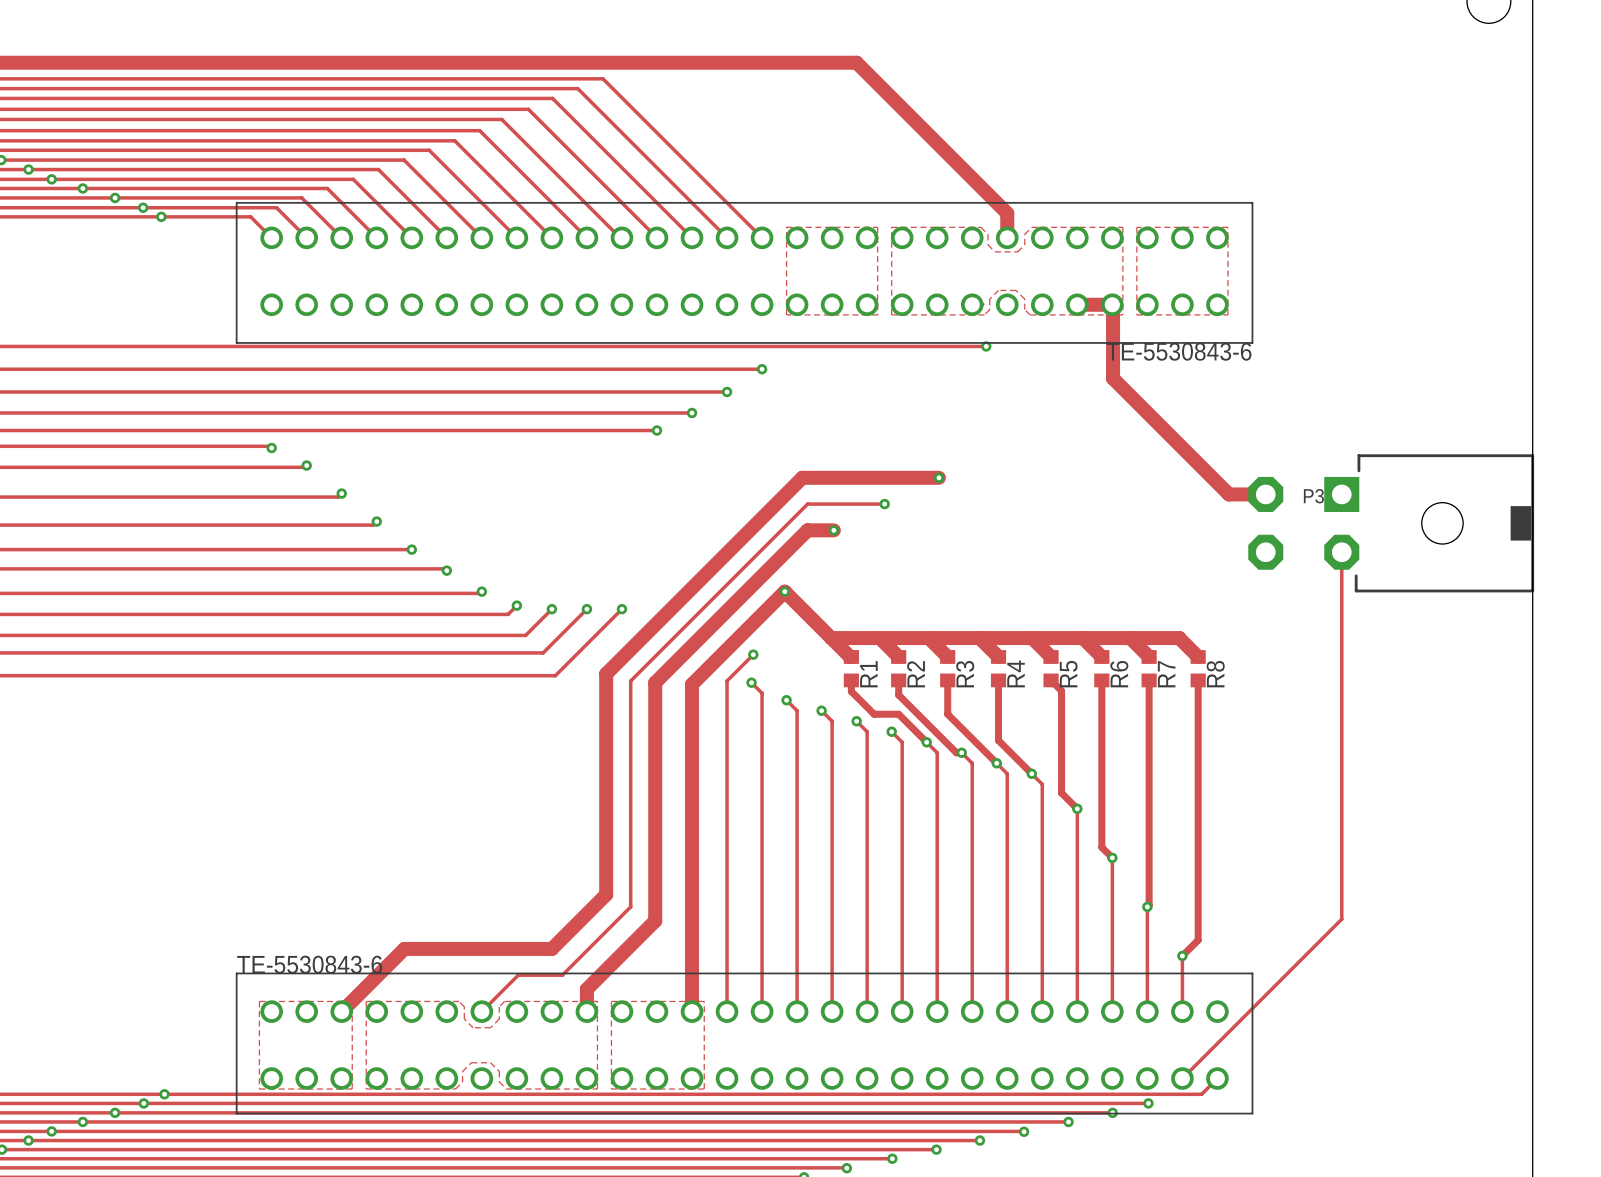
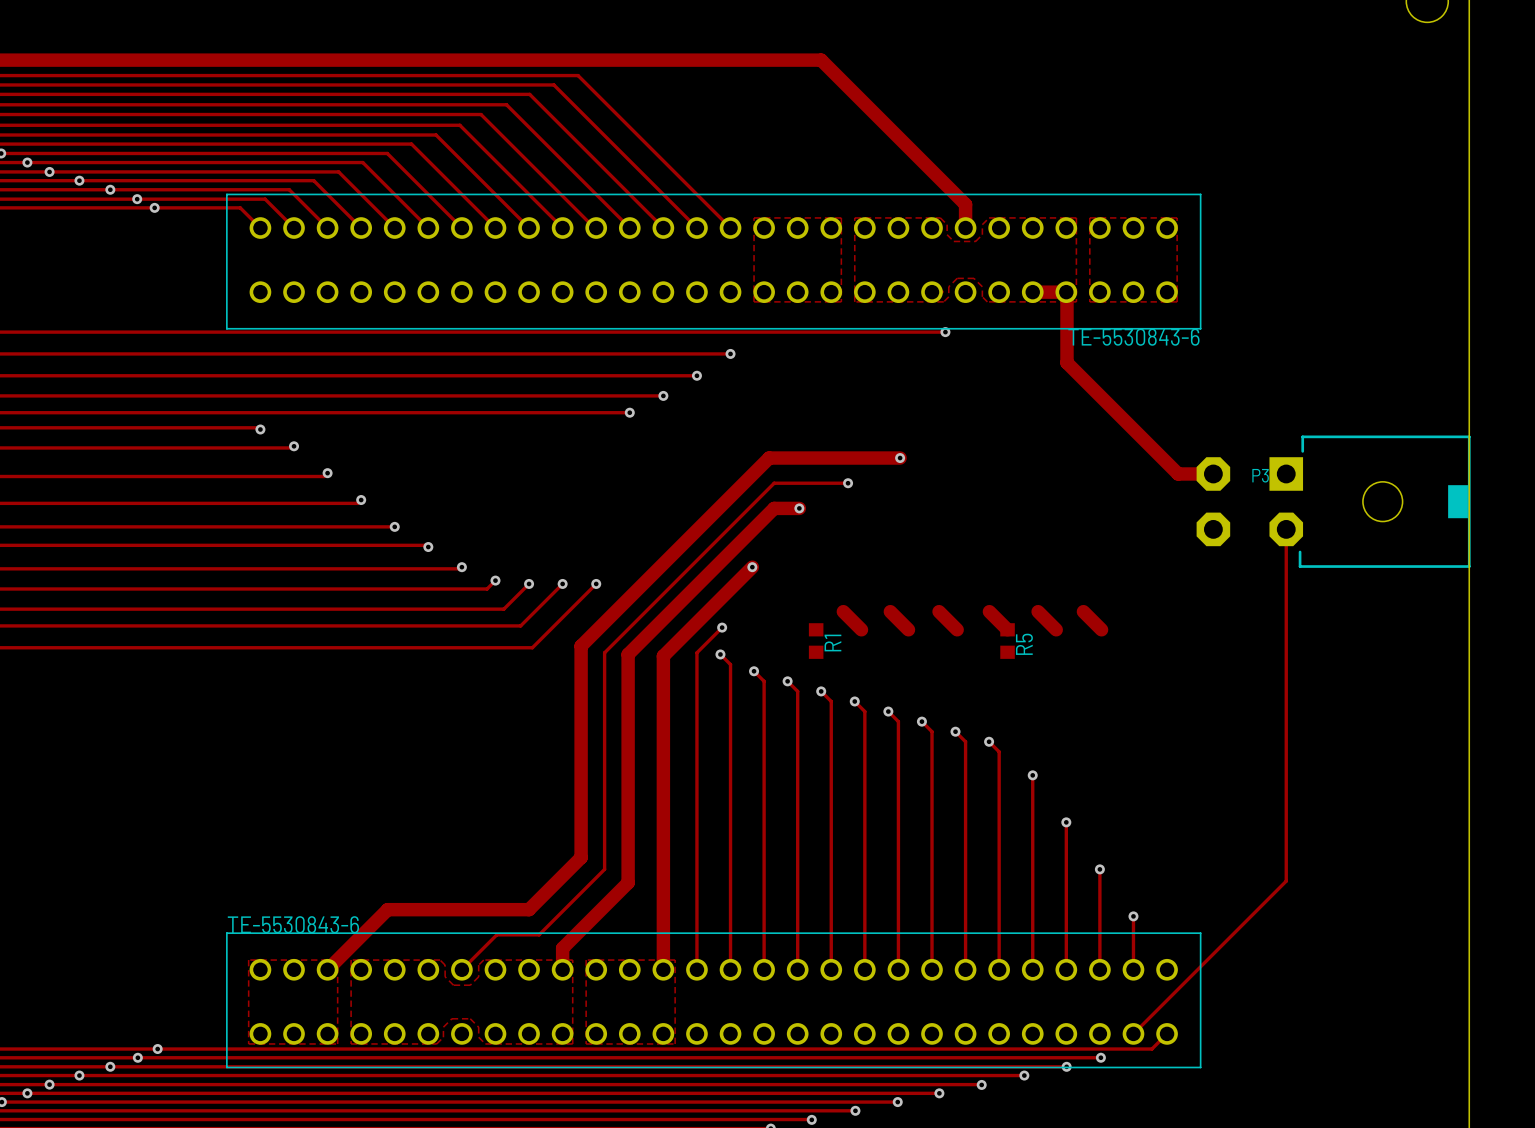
track: (784, 591) (851, 656) -> none
track: (831, 638) (1179, 638) (1198, 656) -> none
R2: (898, 668) -> none
R3: (947, 668) -> none
R4: (998, 668) -> none
R6: (1101, 668) -> none
R7: (1149, 668) -> none
R8: (1198, 668) -> none
track: (851, 680) (851, 691) (874, 714) (898, 714) (926, 742) -> none
track: (898, 680) (898, 694) (956, 752) (961, 752) -> none
track: (947, 680) (947, 714) (996, 763) -> none
track: (998, 680) (998, 740) (1031, 773) -> none
track: (1051, 680) (1061, 690) (1061, 793) (1077, 808) -> none
track: (1101, 680) (1101, 847) (1112, 857) -> none
track: (1149, 680) (1149, 905) (1147, 906) -> none
track: (1198, 680) (1198, 940) (1182, 955) -> none

